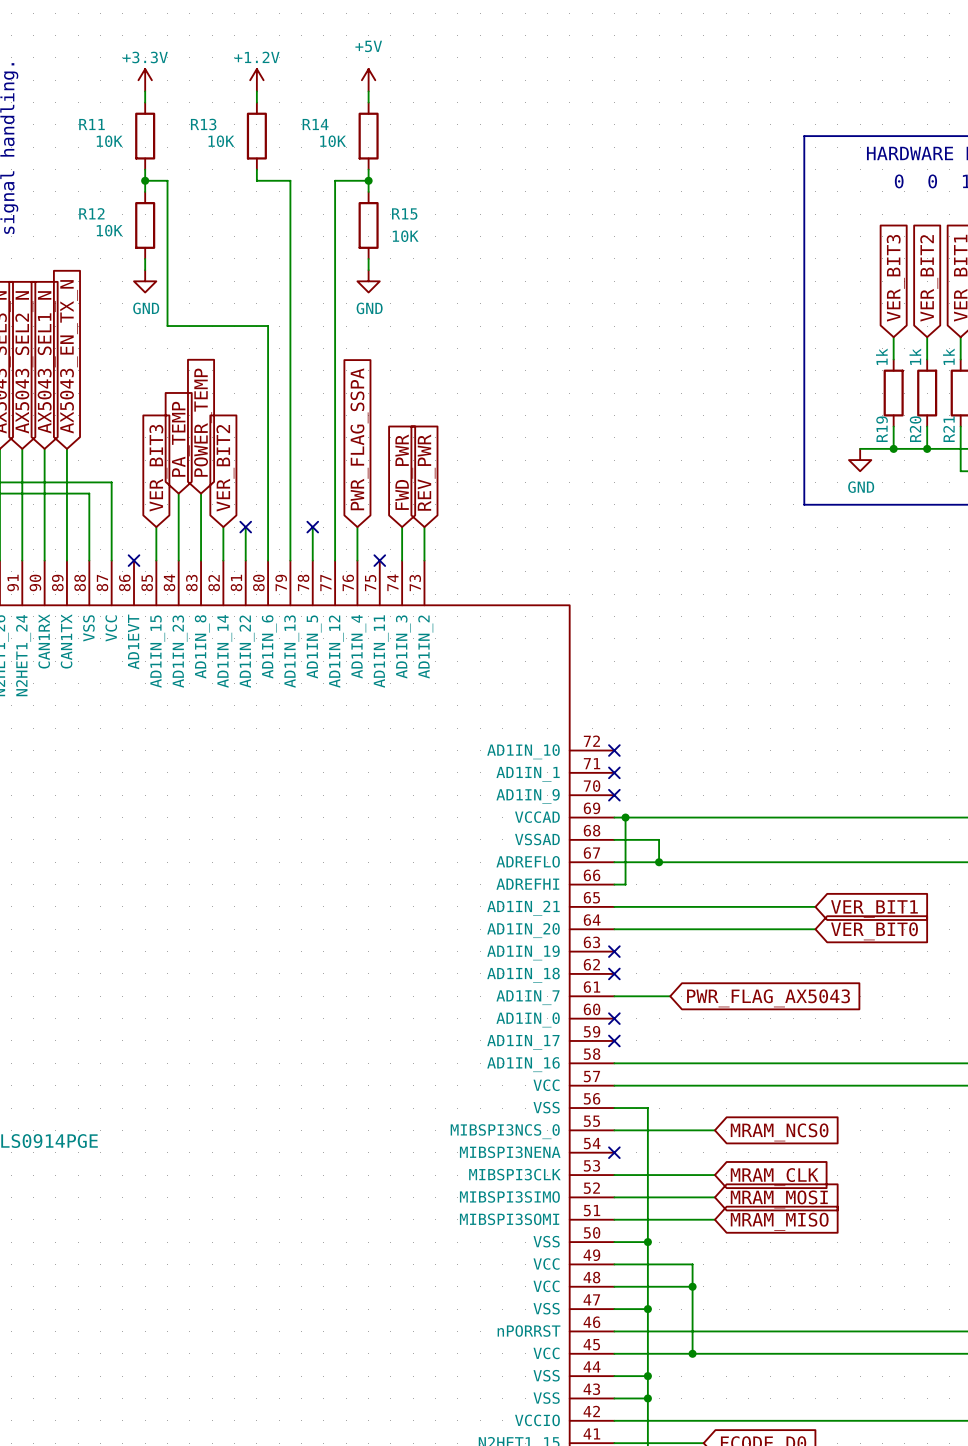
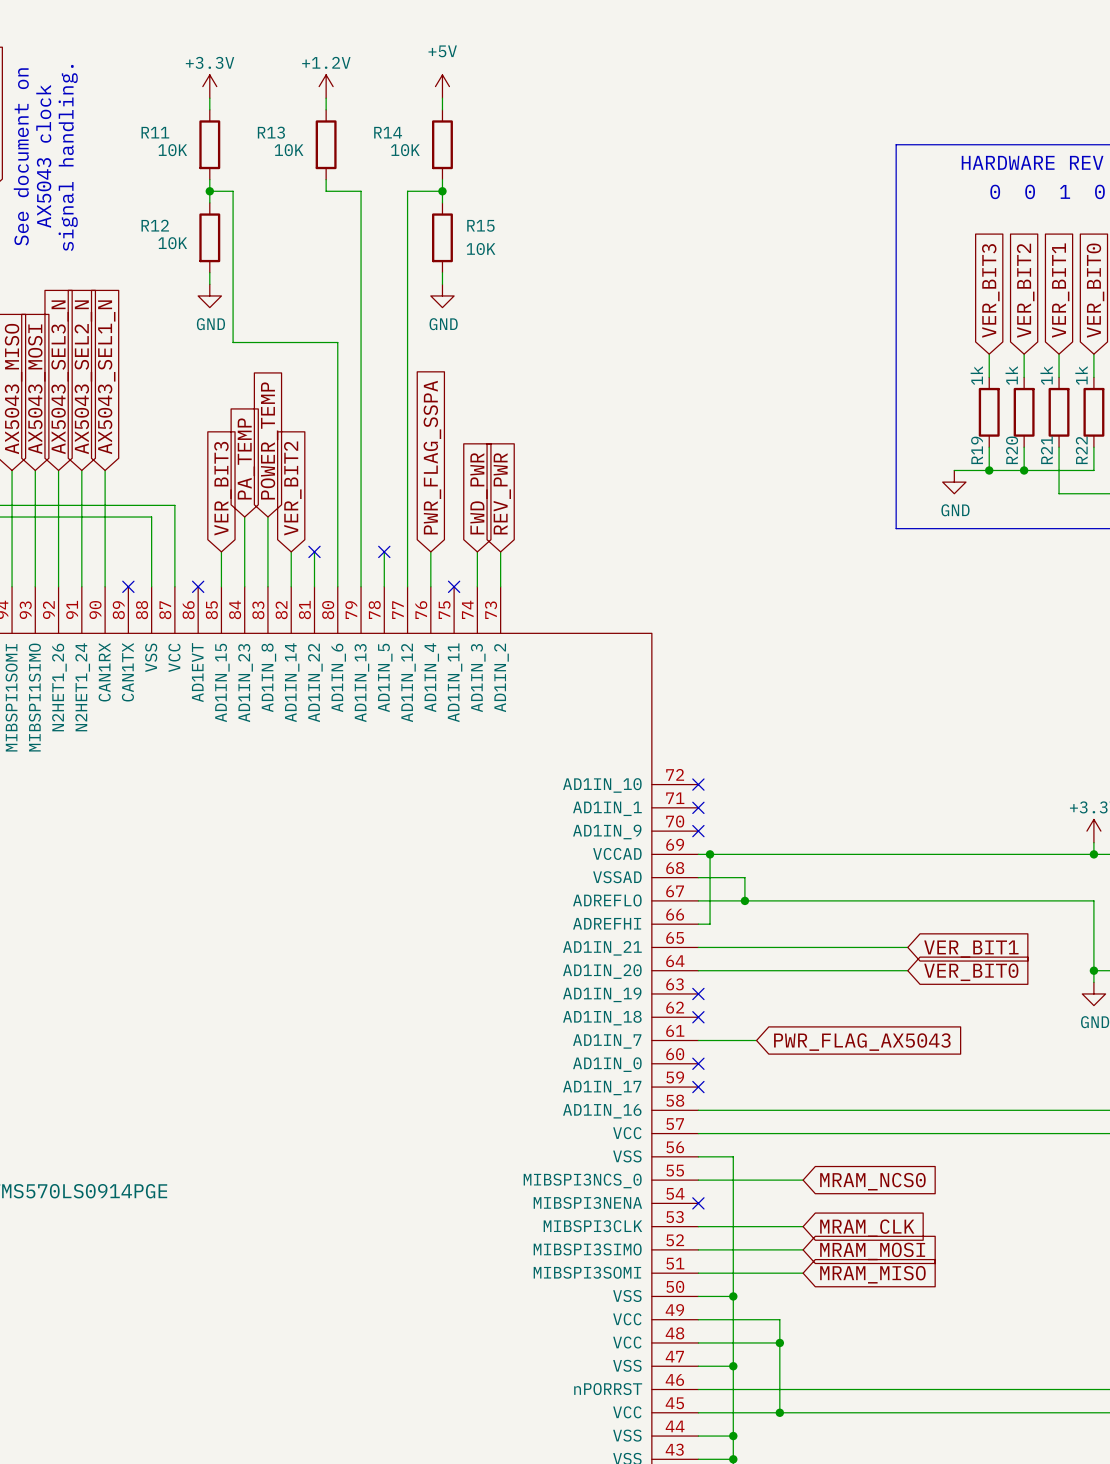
global label: AX5043_EN_TX_N (69, 356) -> none
wire: (66, 448) (66, 560) -> none
no-connect mark: none -> (128, 586)

